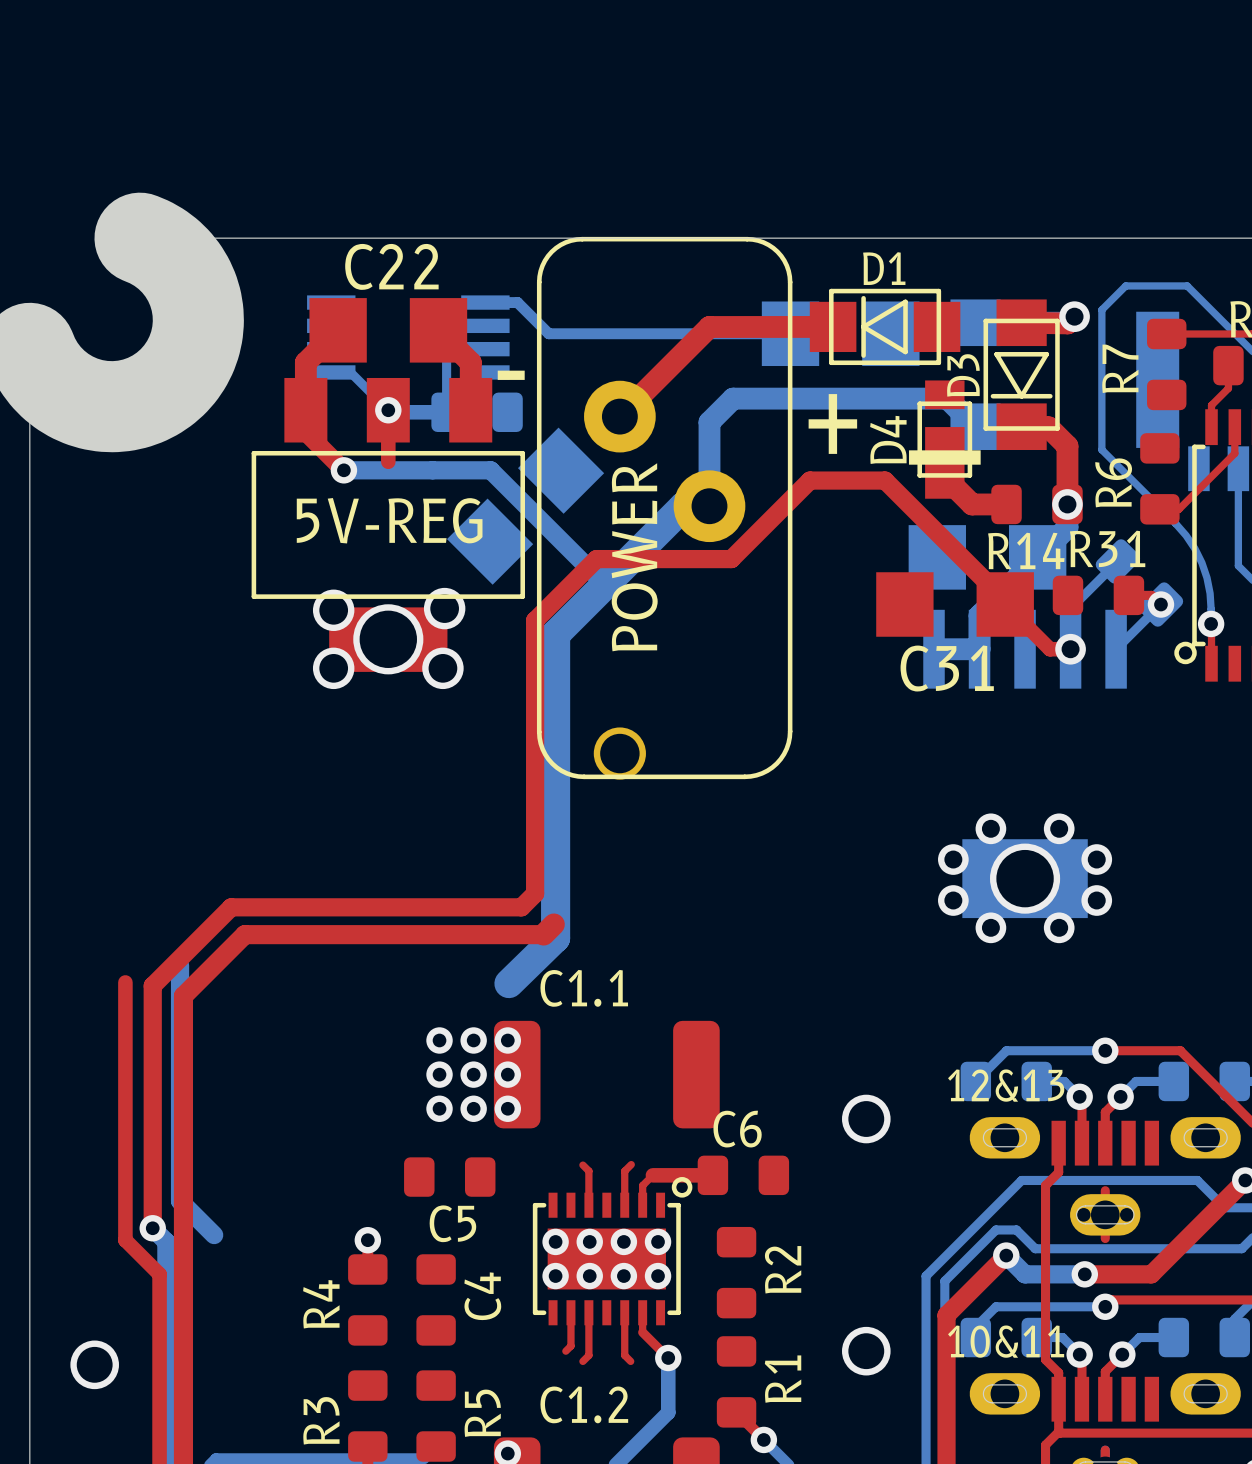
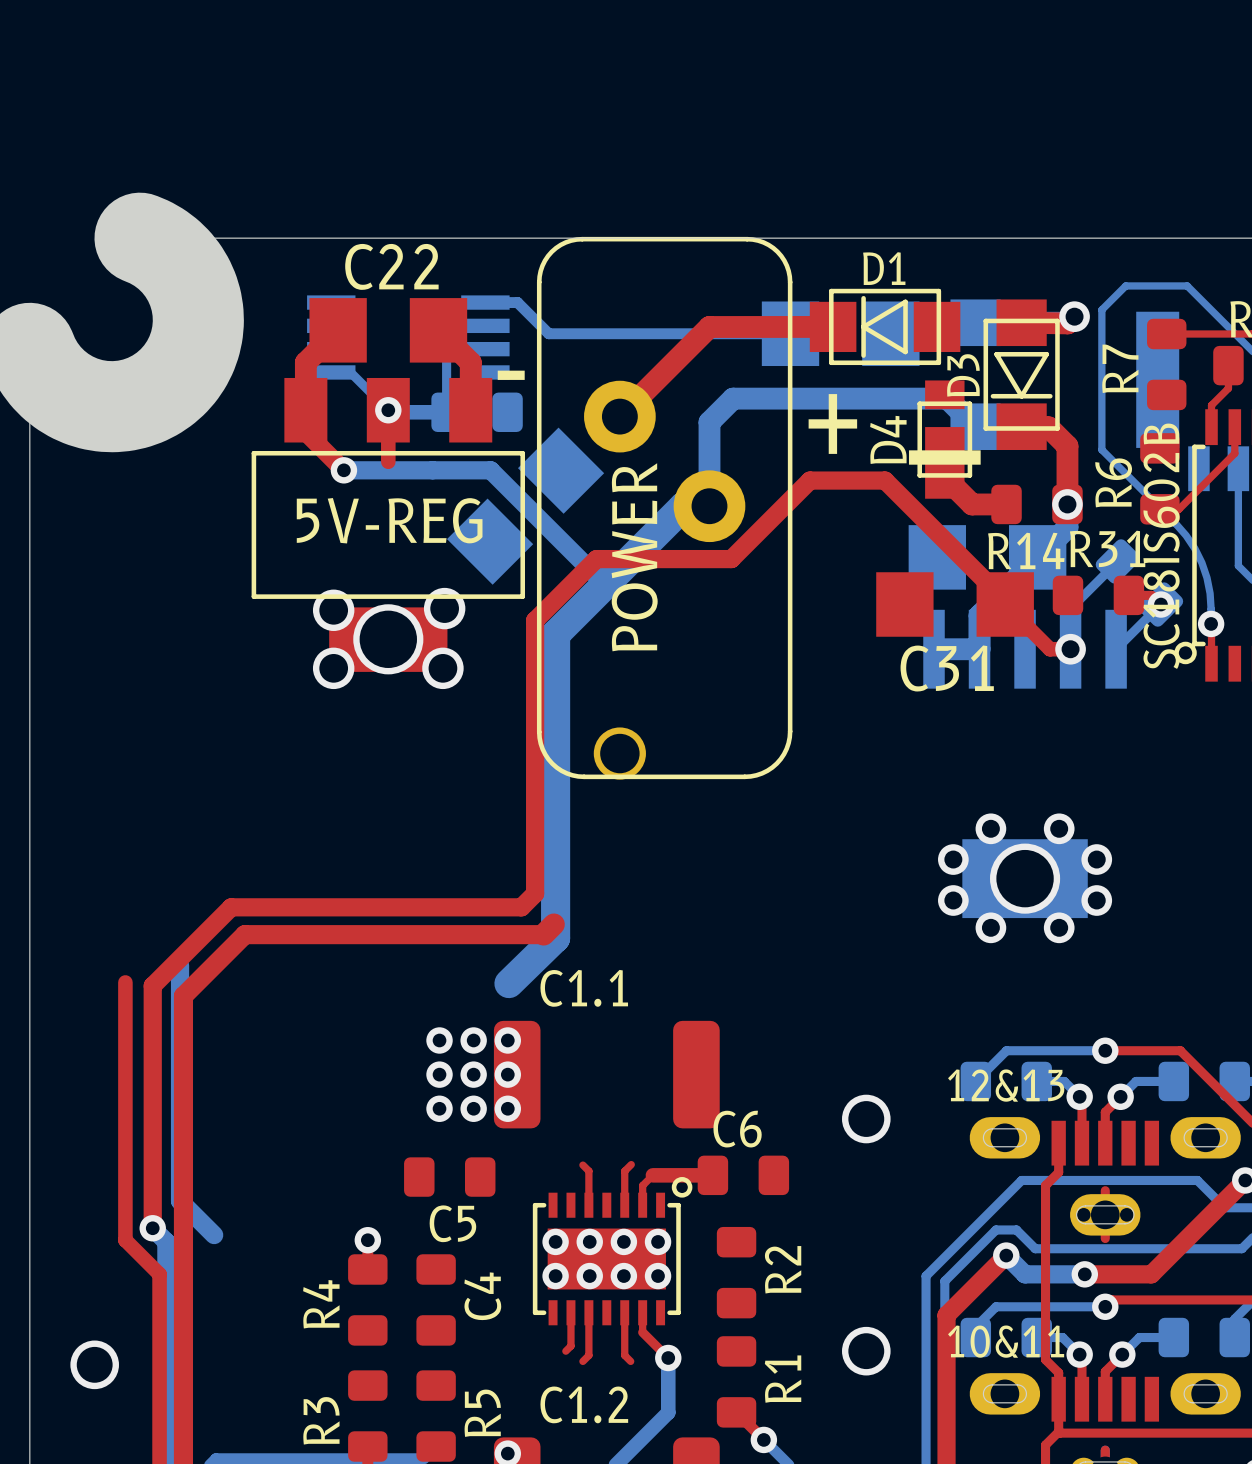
SC18IS602B name: none -> SC18IS602B (1161, 546)

